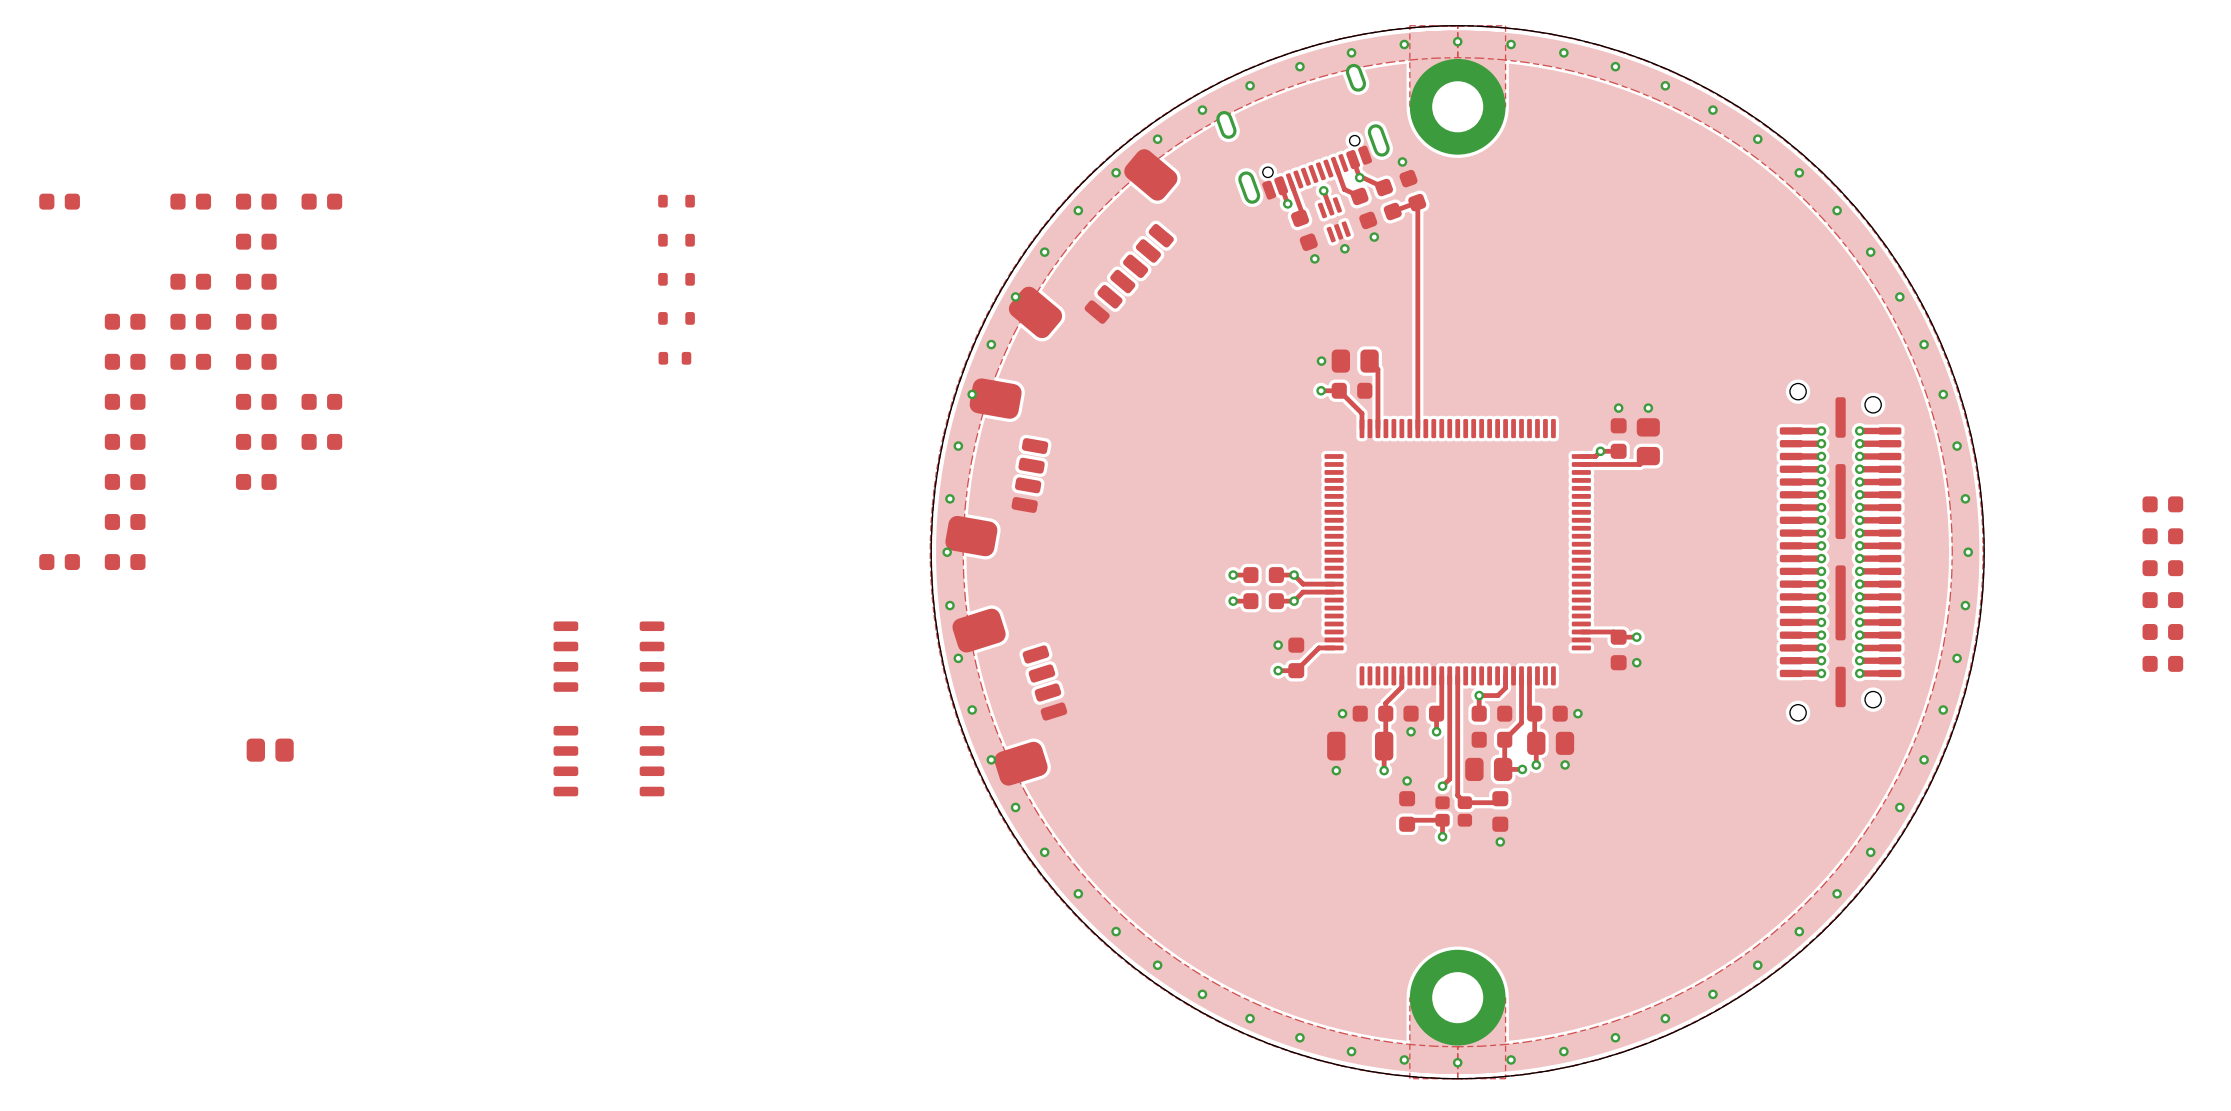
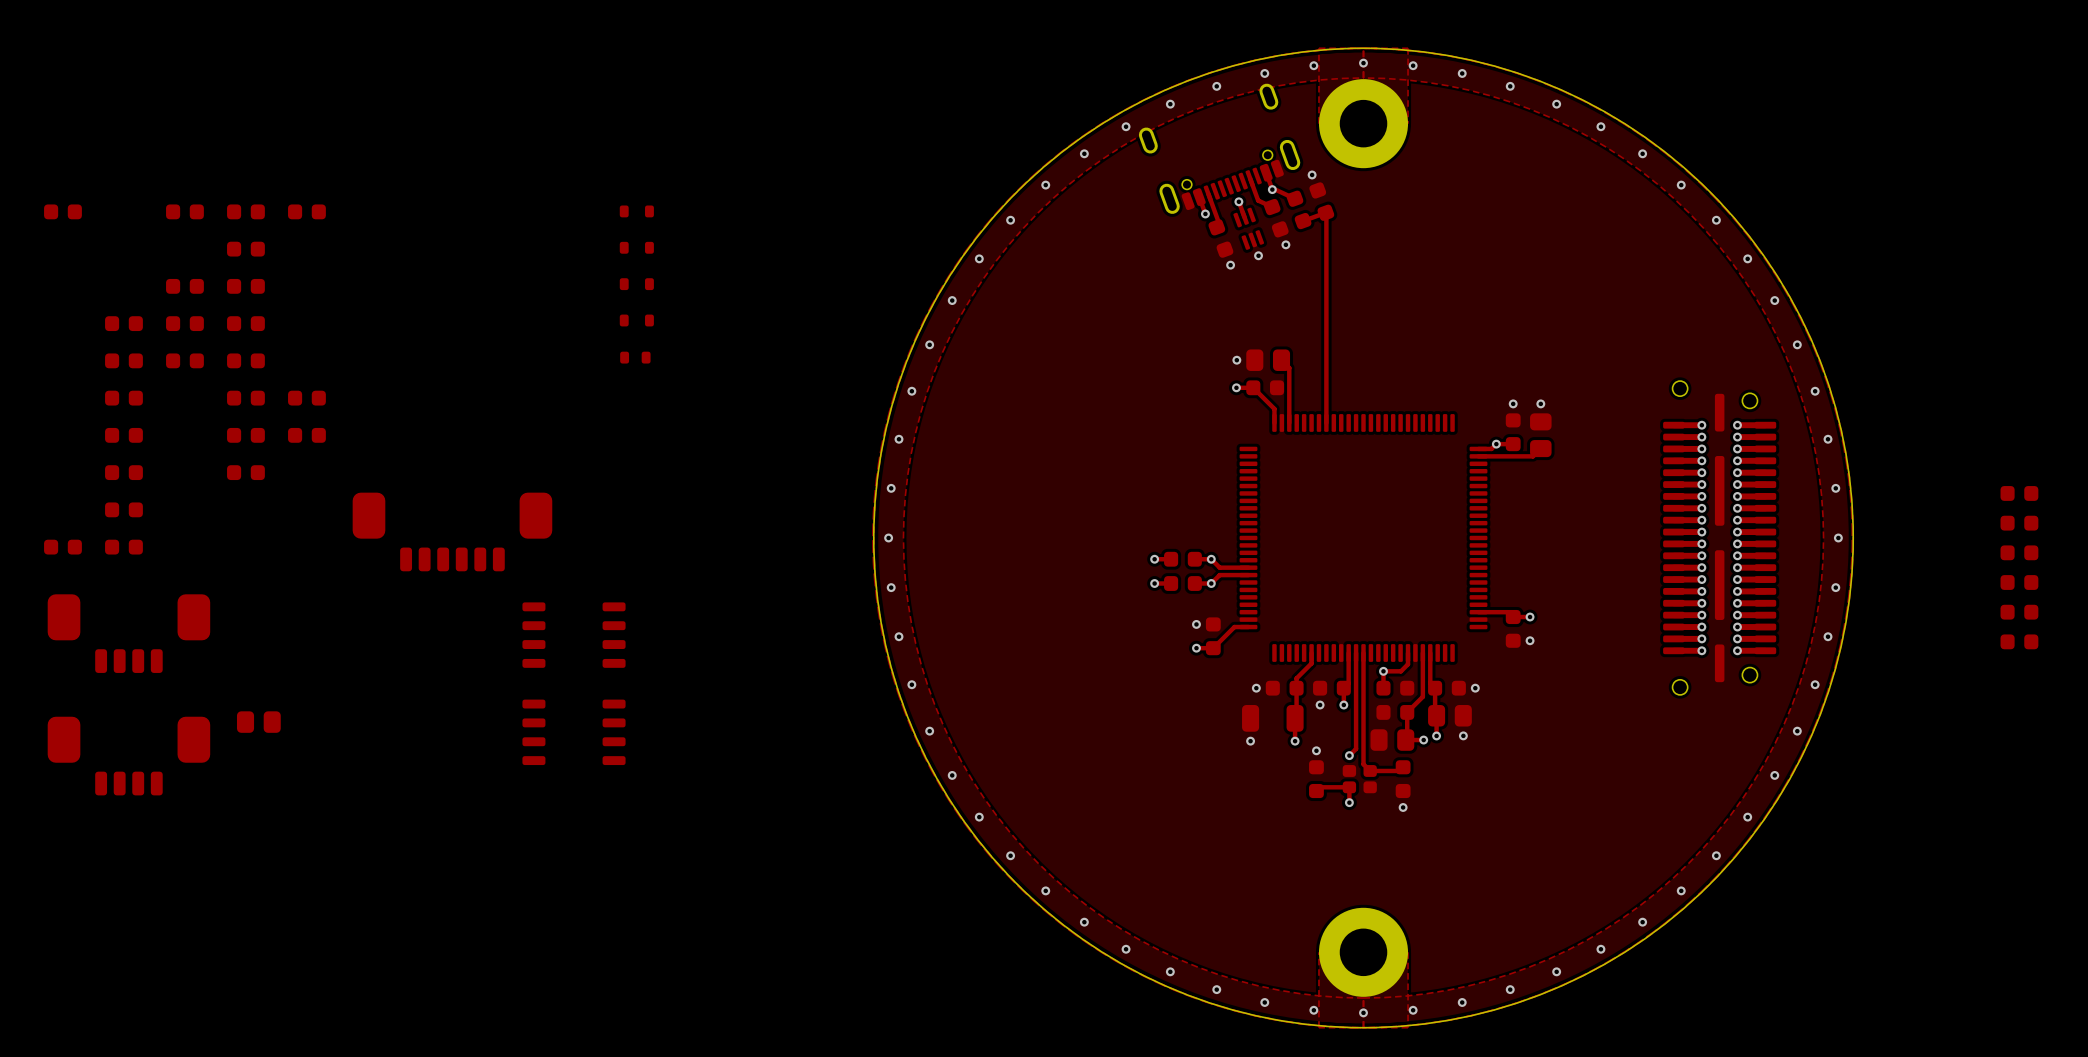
part: (1093, 243) -> none
part: (996, 467) -> none
part: none -> (452, 531)
part: none -> (128, 633)
part: (1009, 697) -> none
part: none -> (128, 756)

